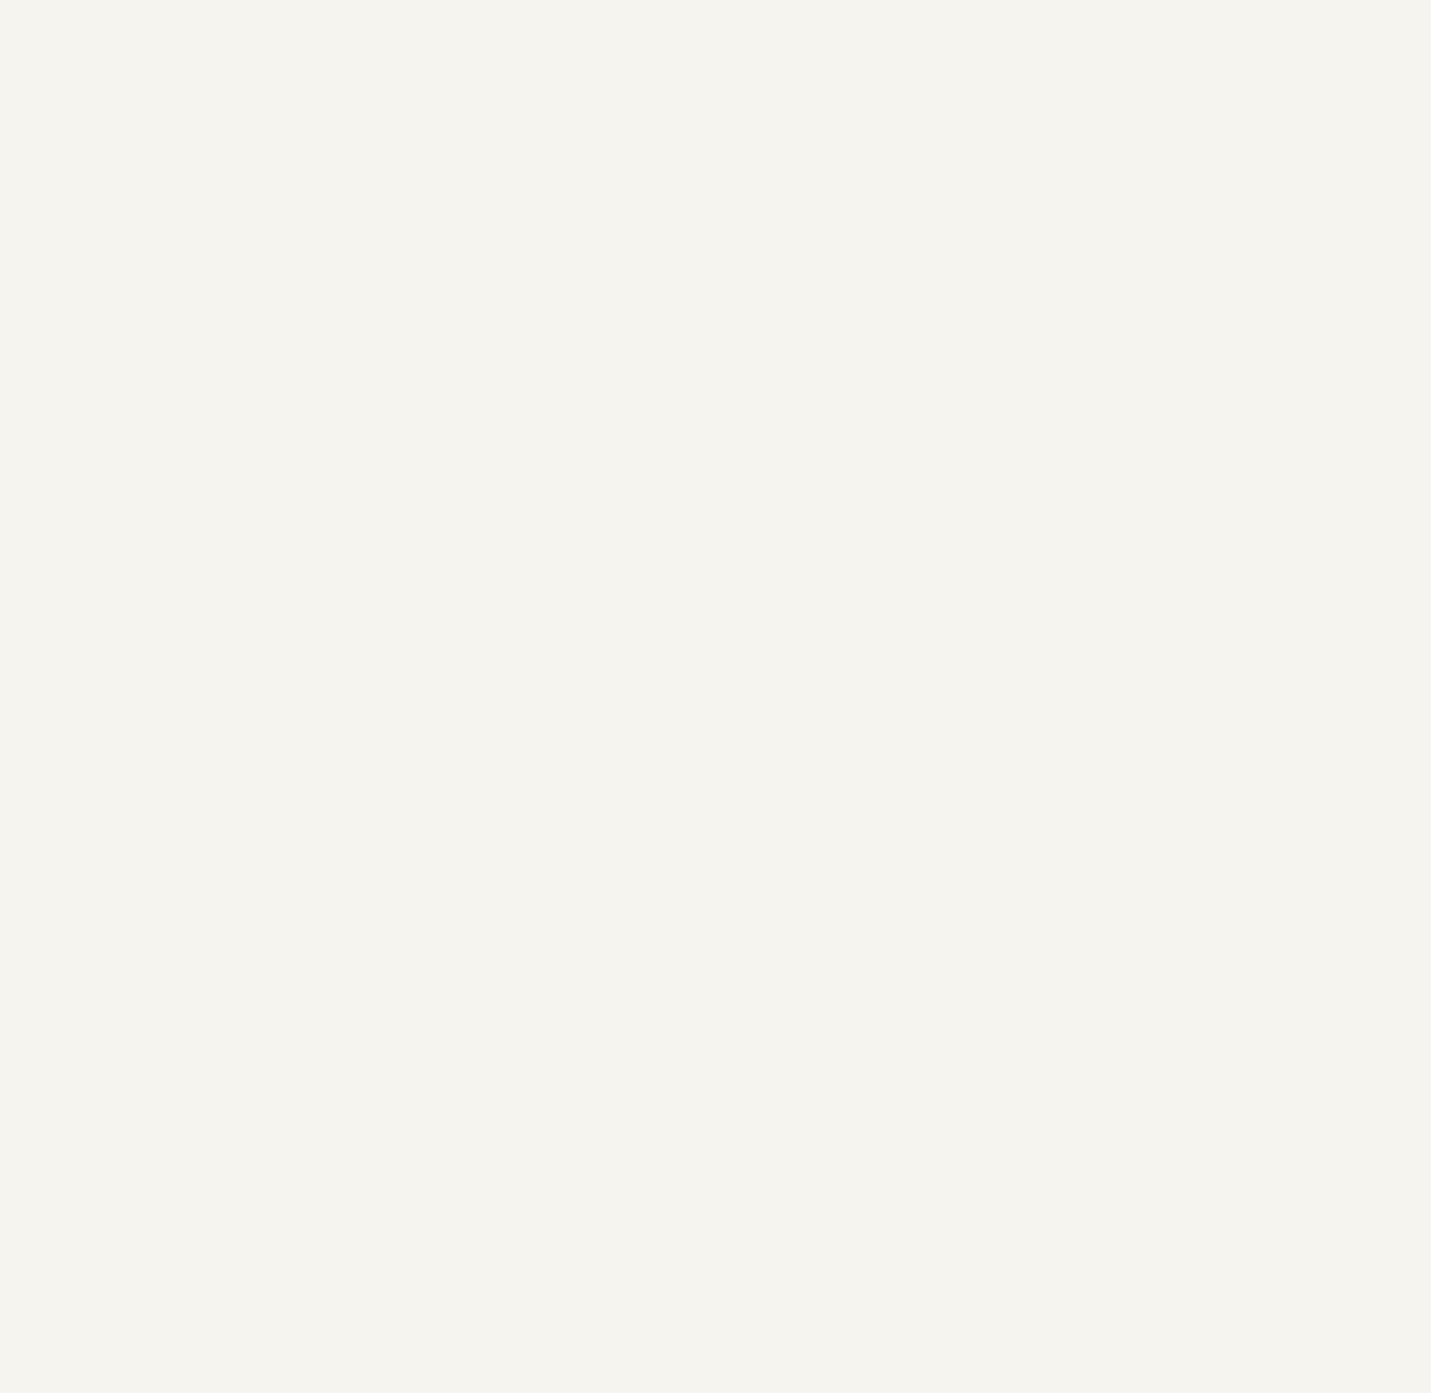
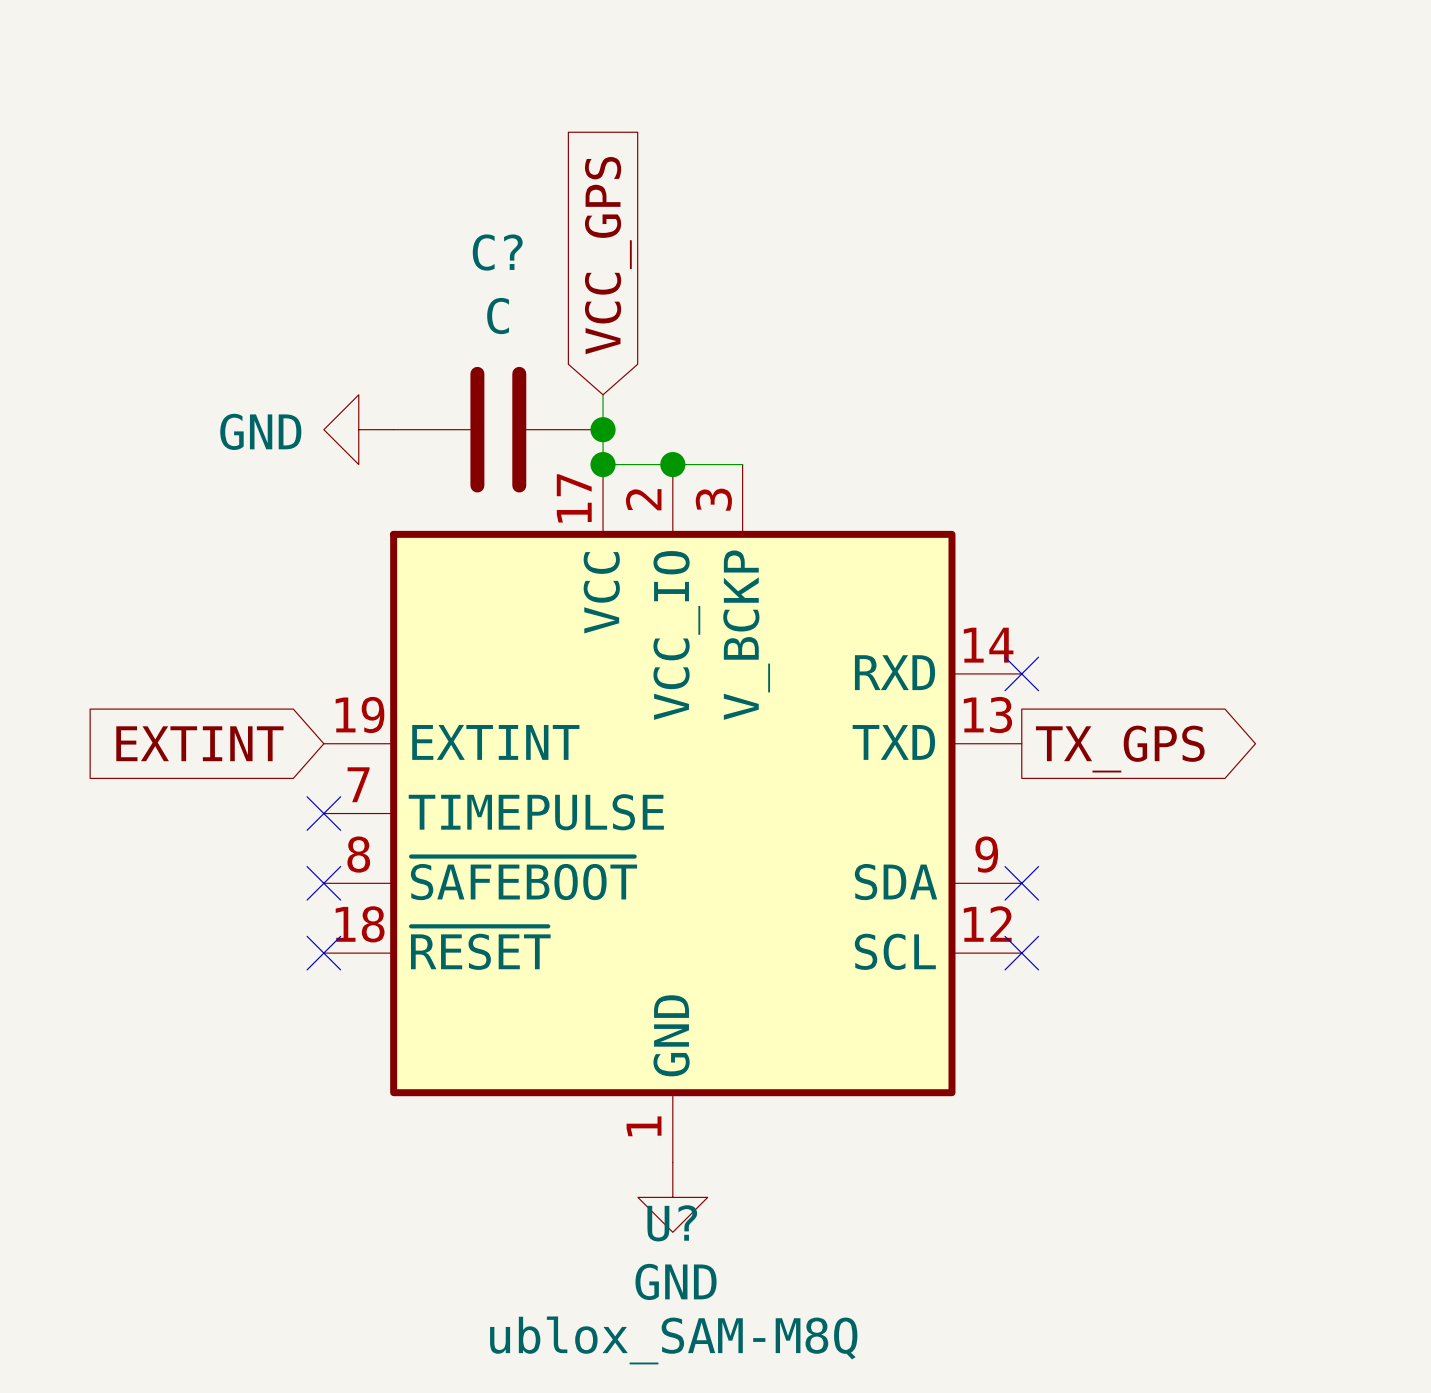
global label: none -> VCC_GPS (608, 255)
wire: none -> (603, 394) (603, 464) (742, 464)
power symbol: none -> GND (358, 429)
C?: none -> C (498, 429)
junction: none -> (603, 429)
junction: none -> (603, 464)
junction: none -> (672, 464)
no-connect mark: none -> (1021, 673)
global label: none -> EXTINT (199, 743)
global label: none -> TX_GPS (1120, 749)
no-connect mark: none -> (323, 813)
U?: none -> ublox_SAM-M8Q (672, 813)
no-connect mark: none -> (323, 883)
no-connect mark: none -> (1021, 883)
no-connect mark: none -> (323, 953)
no-connect mark: none -> (1021, 953)
power symbol: none -> GND (672, 1197)

